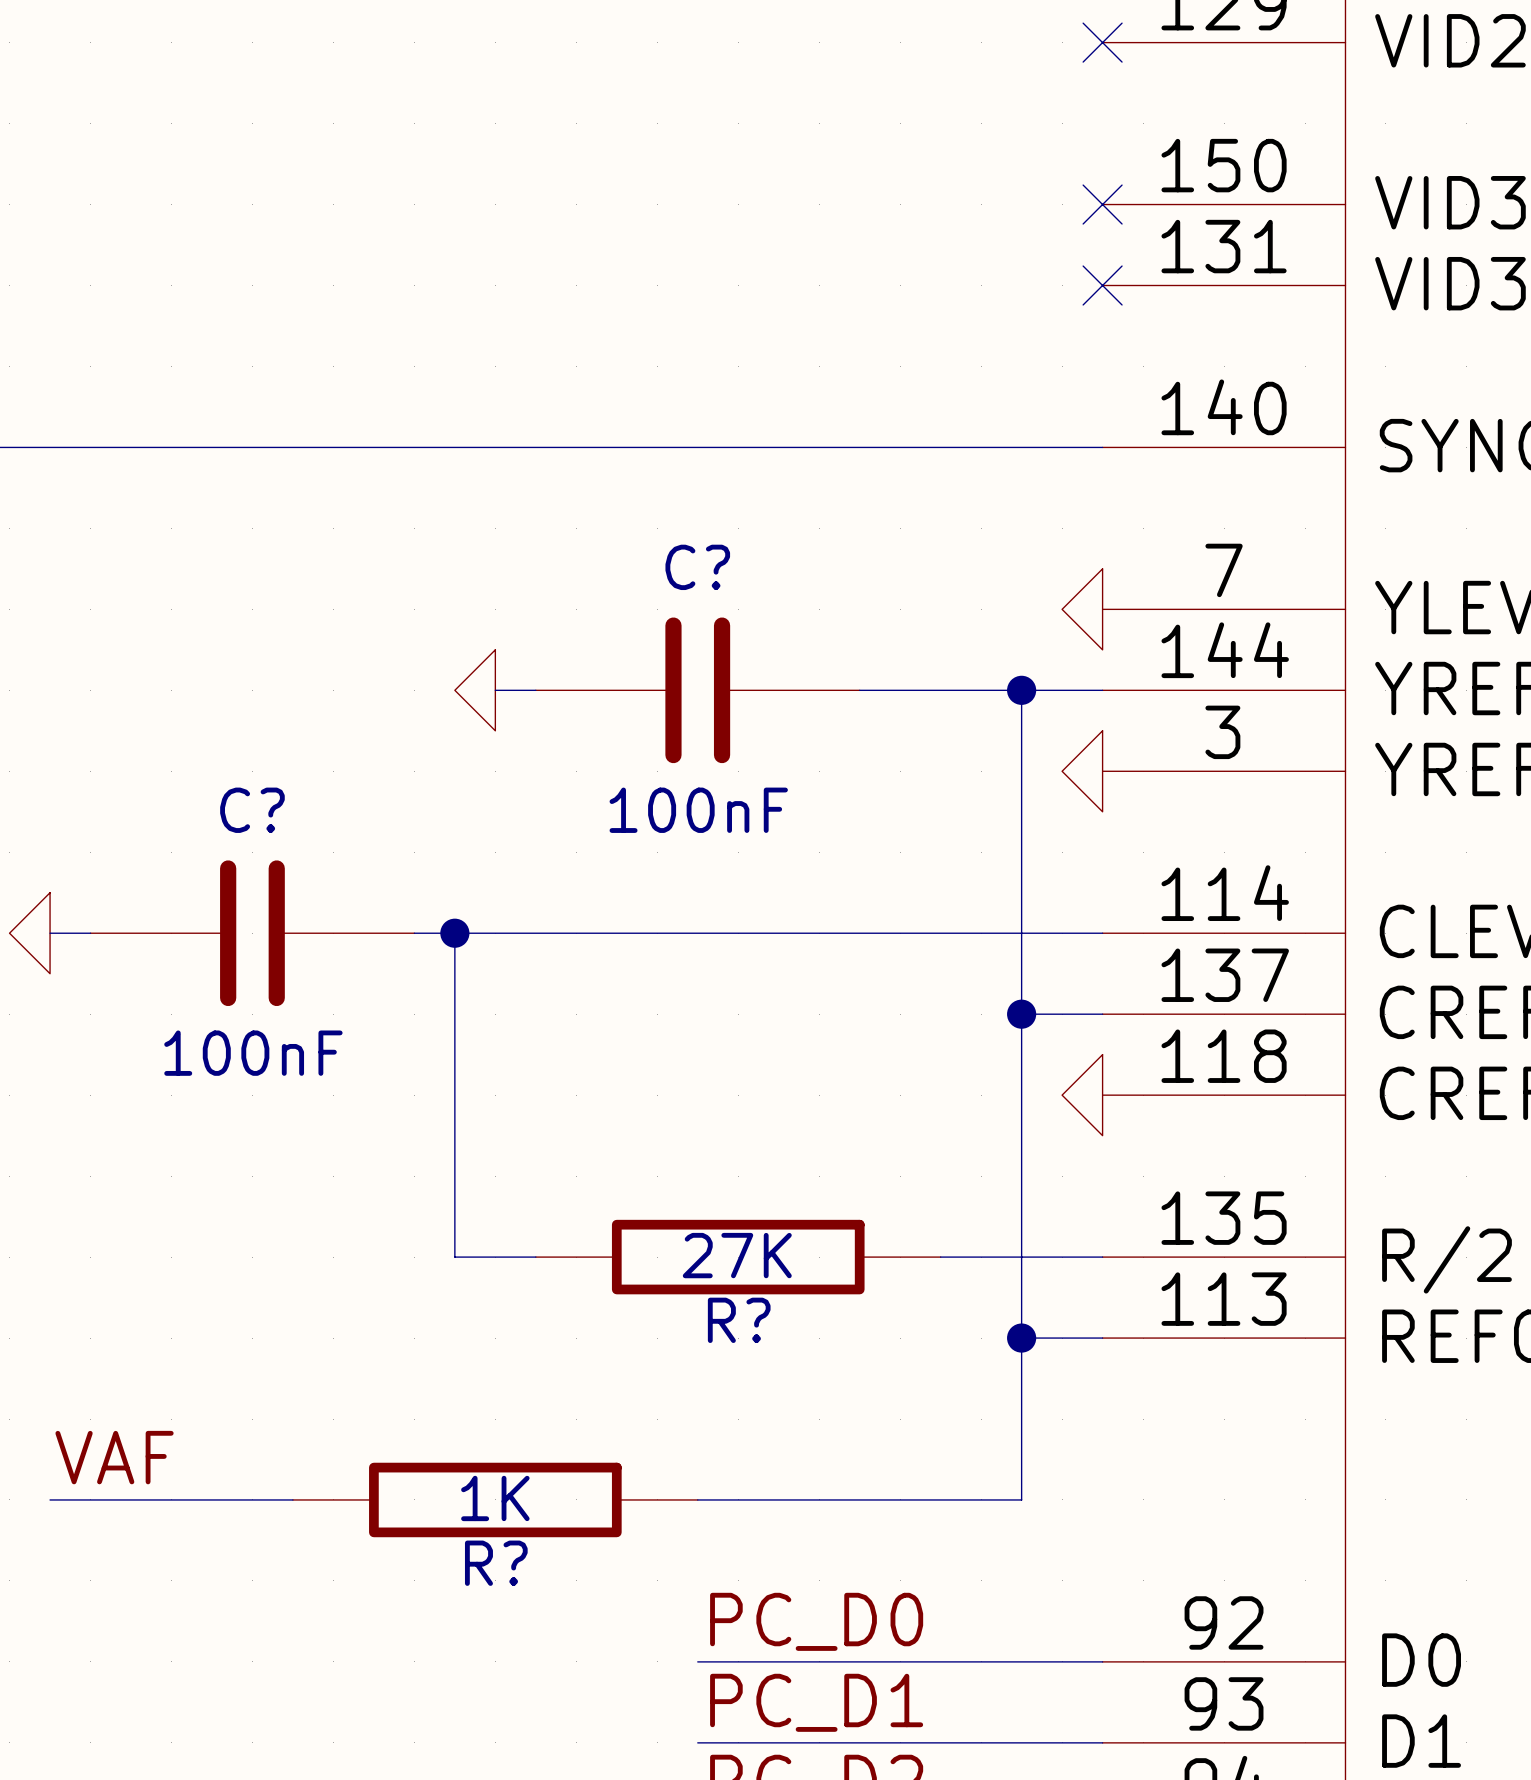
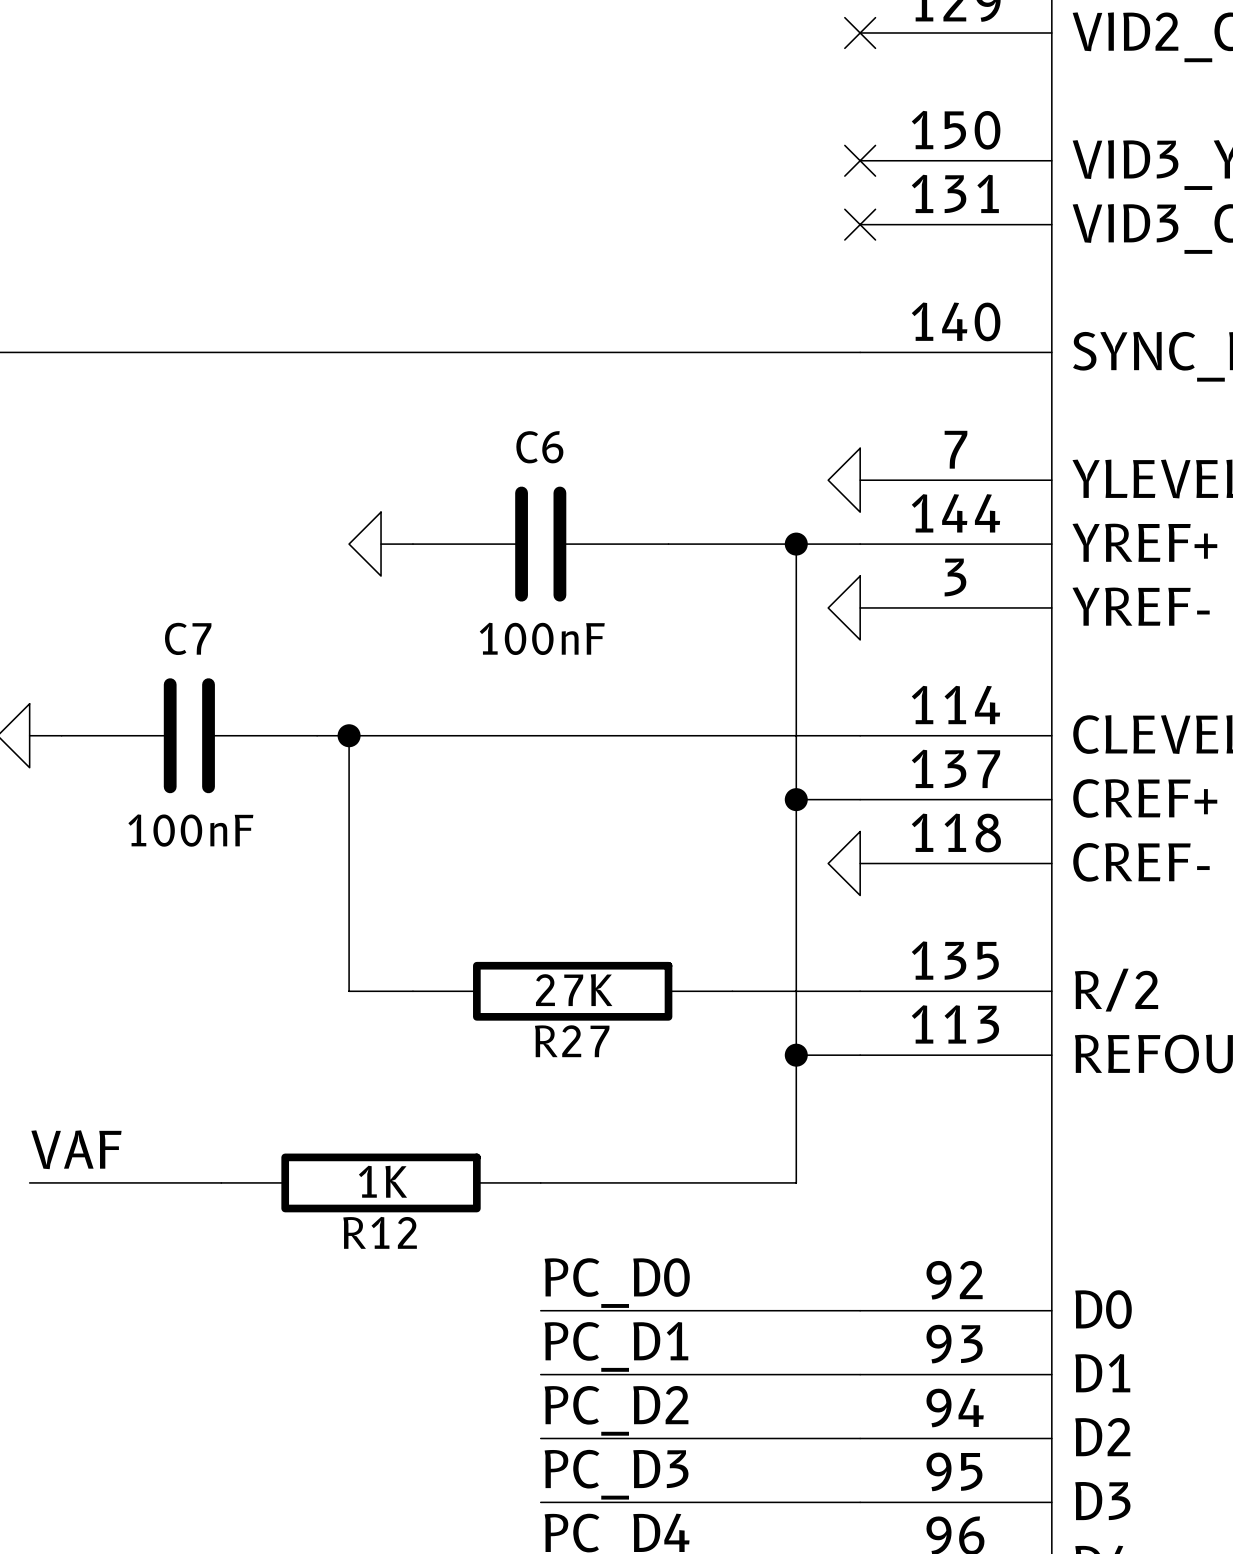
C? name: C? (697, 567) -> C6 (539, 447)
C? name: C? (252, 810) -> C7 (188, 638)
R? name: R? (739, 1320) -> R27 (572, 1041)
R? name: R? (496, 1563) -> R12 (380, 1232)

